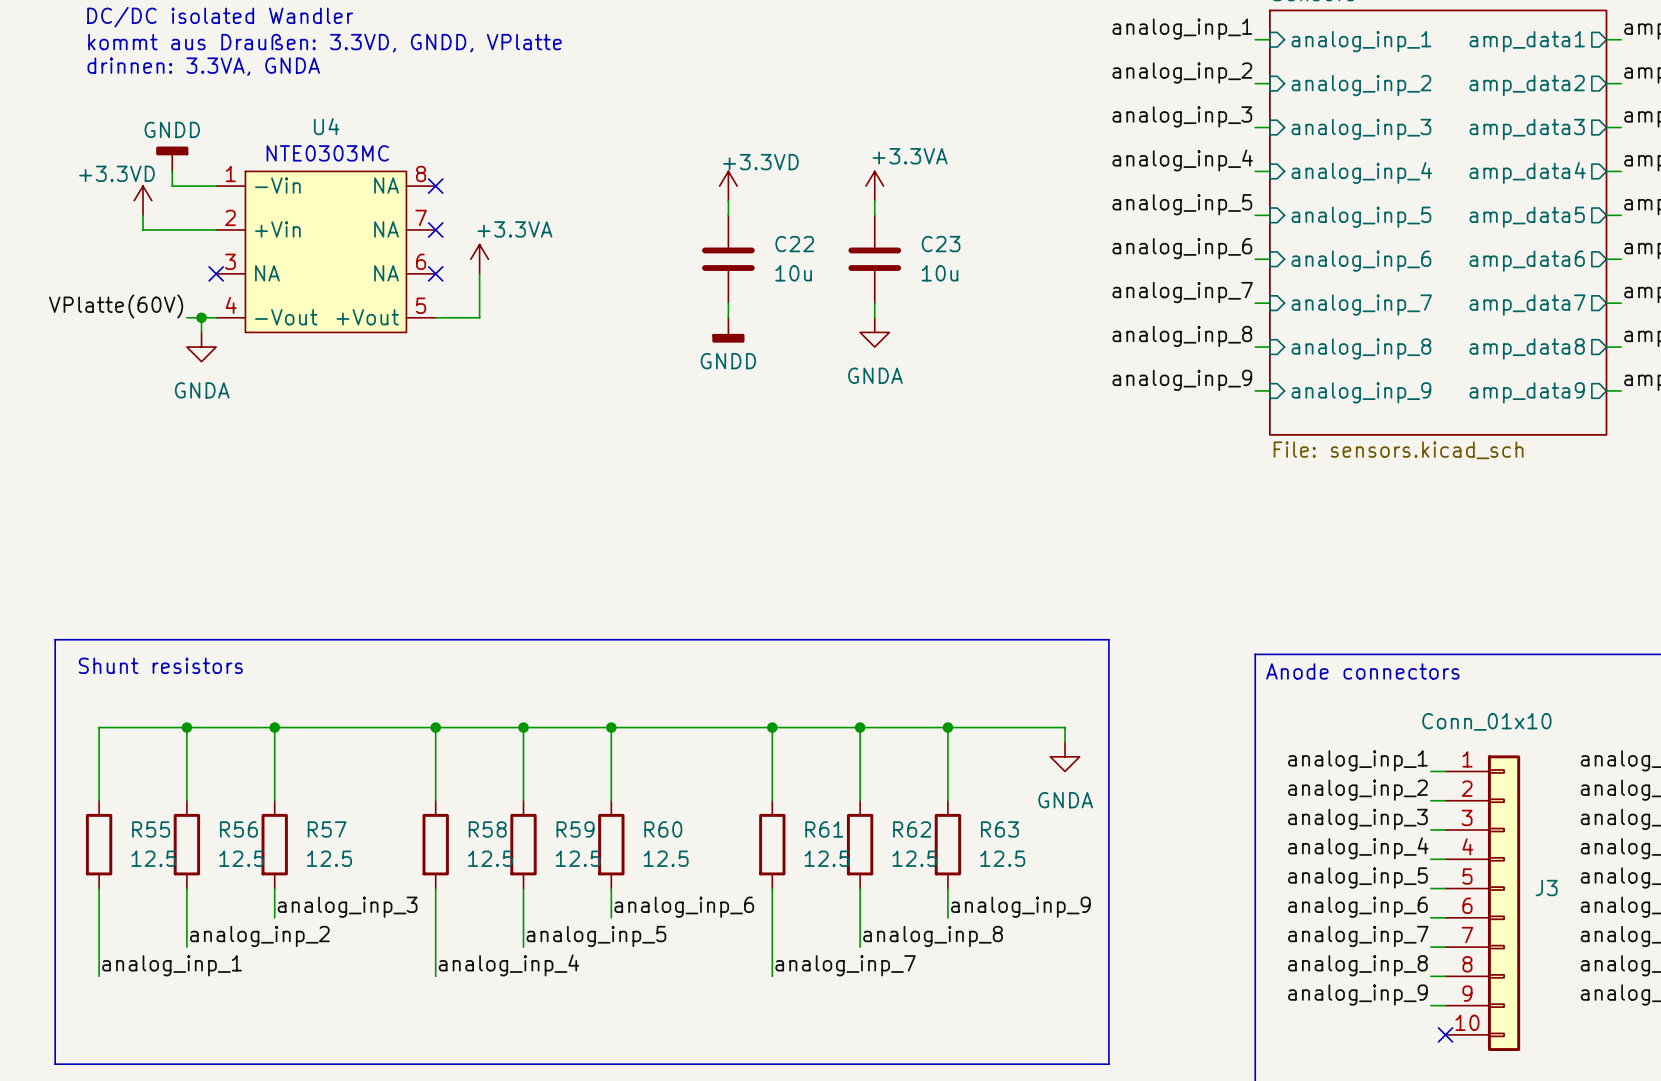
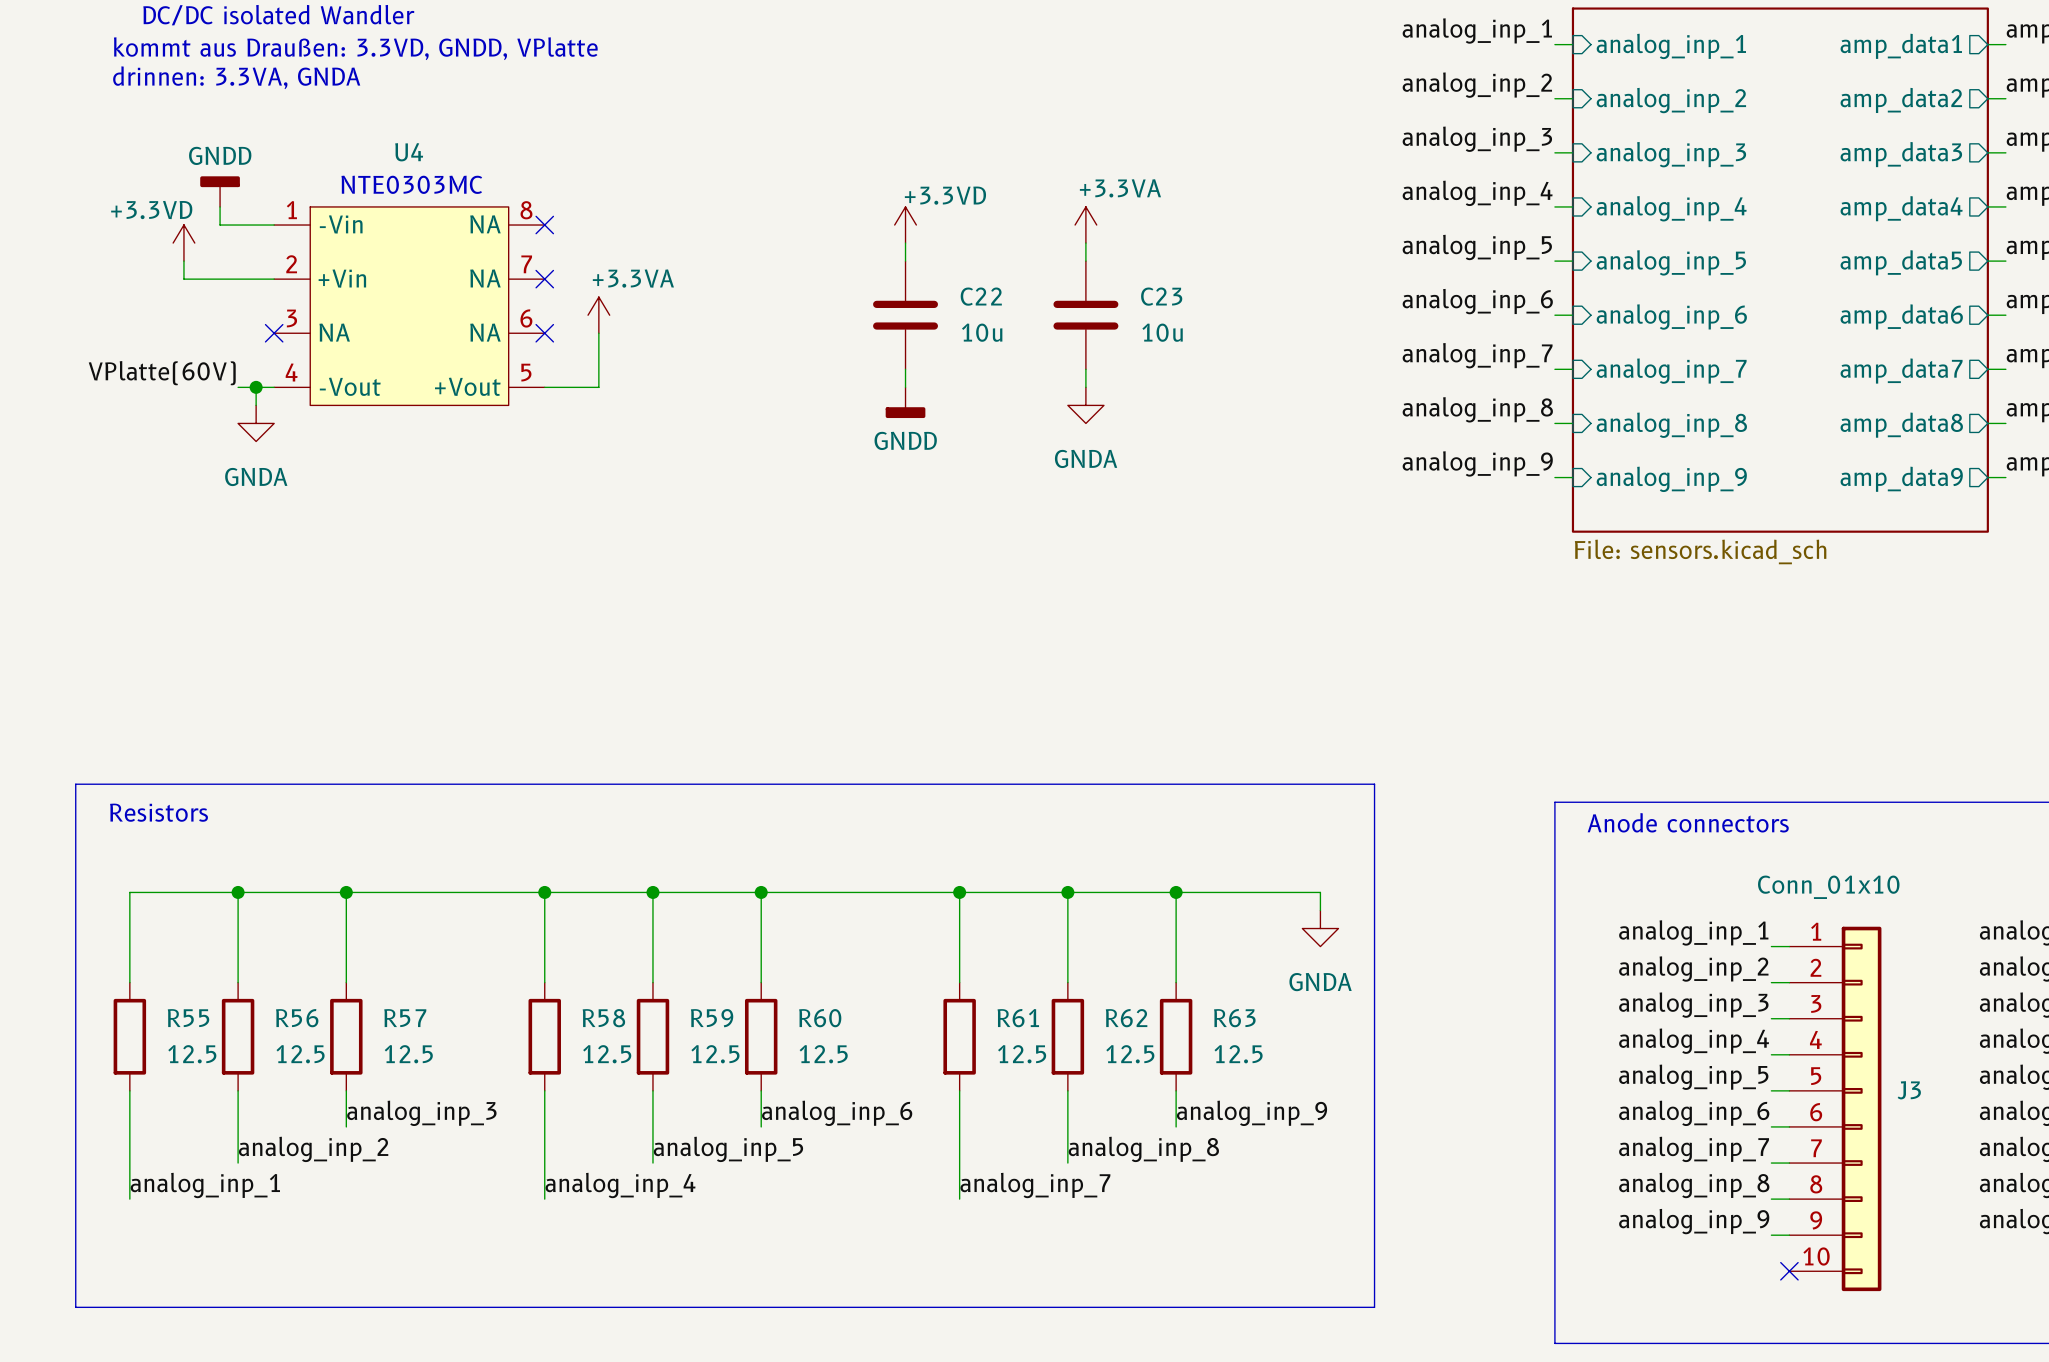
text: Shunt resistors (160, 665) -> Resistors (159, 812)

